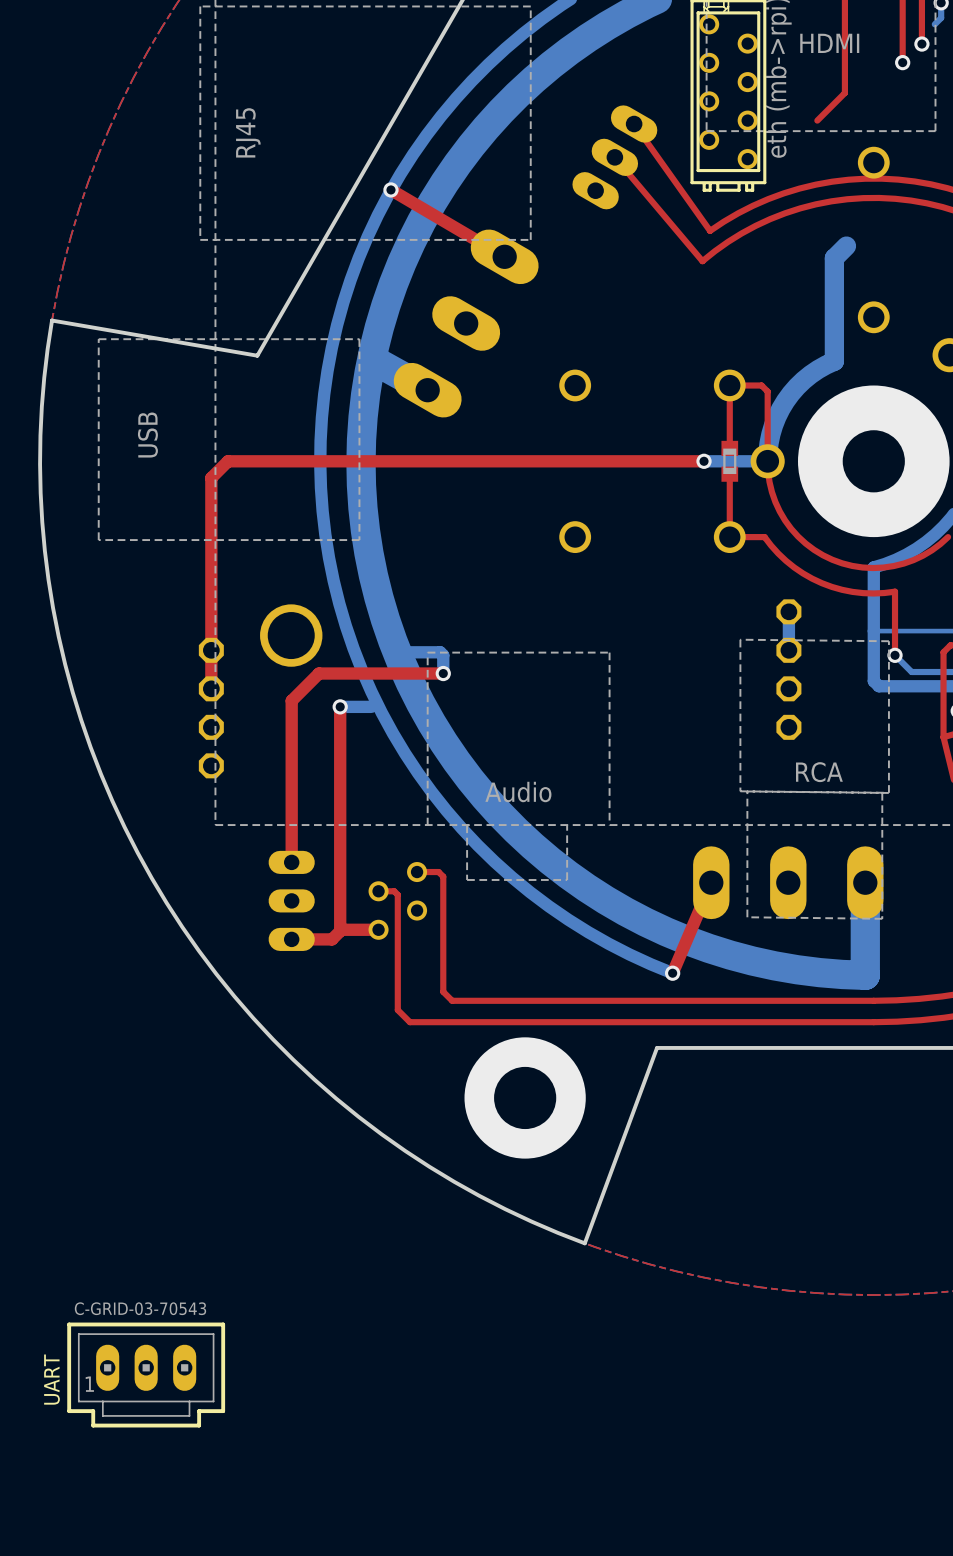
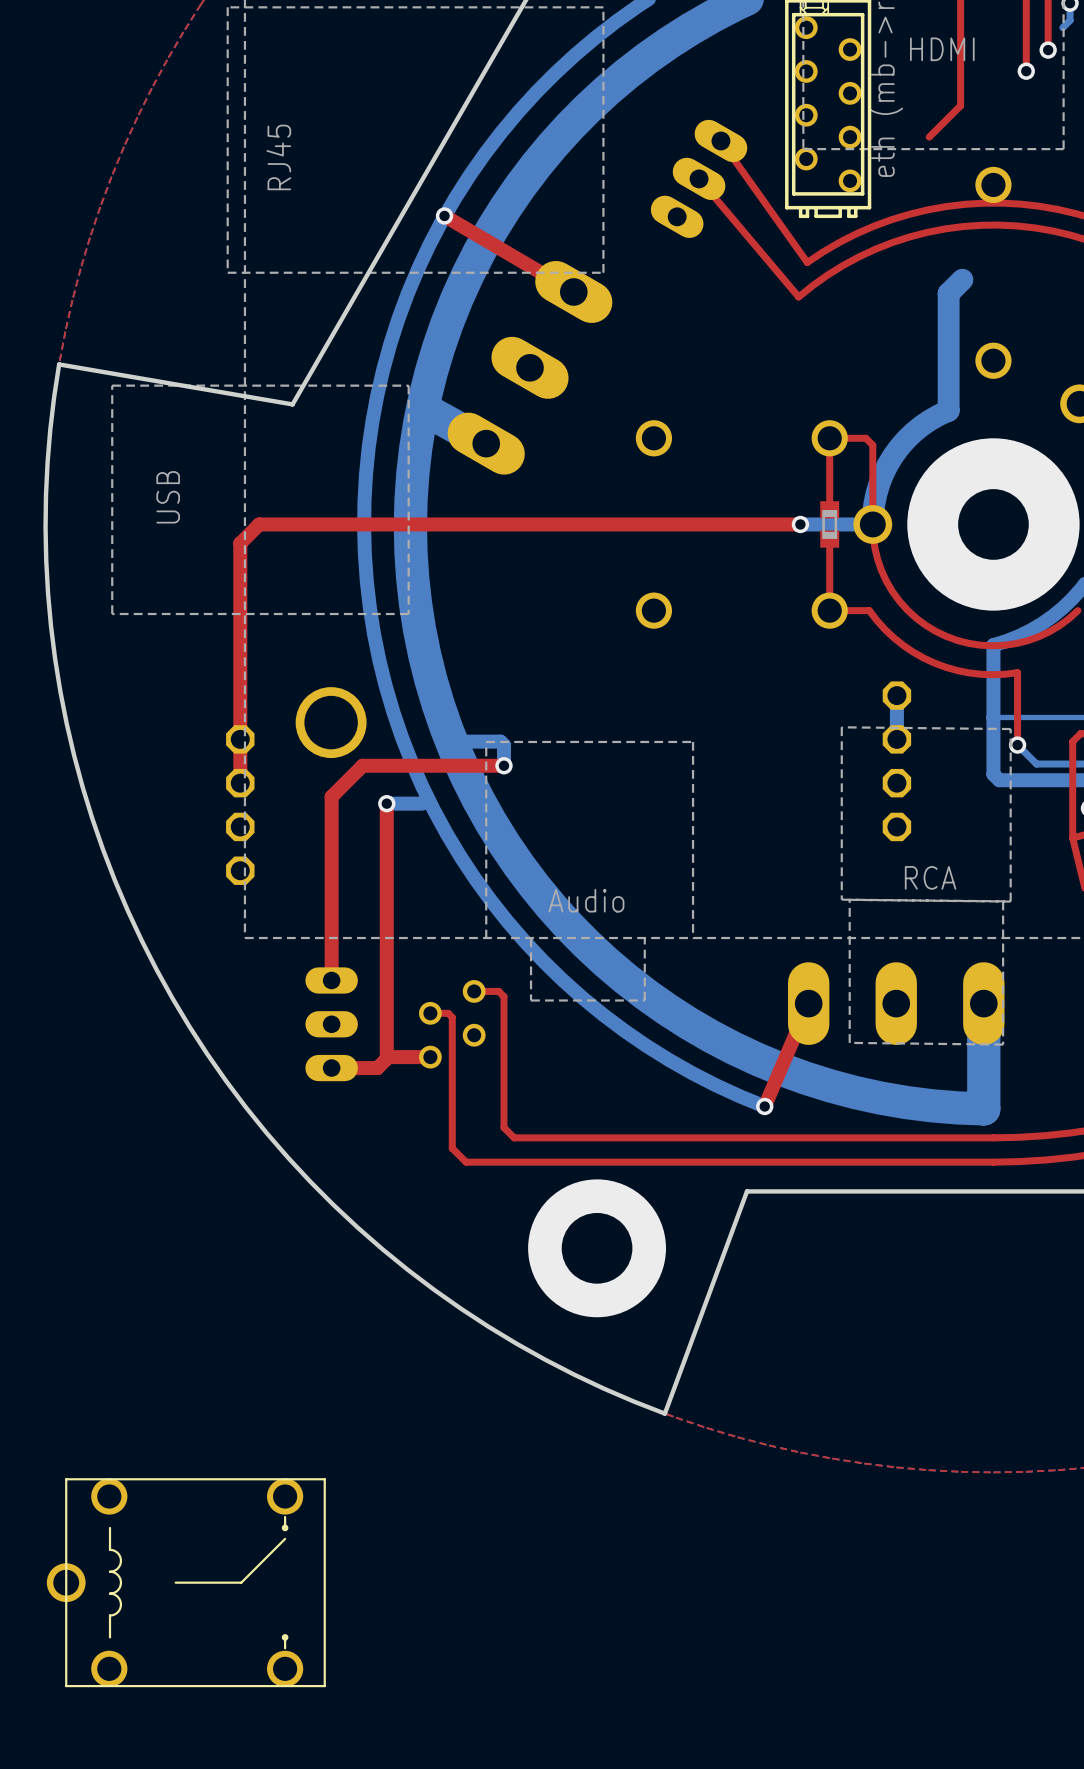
UART: C-GRID-03-70543 (146, 1375) -> none
part: none -> (186, 1582)

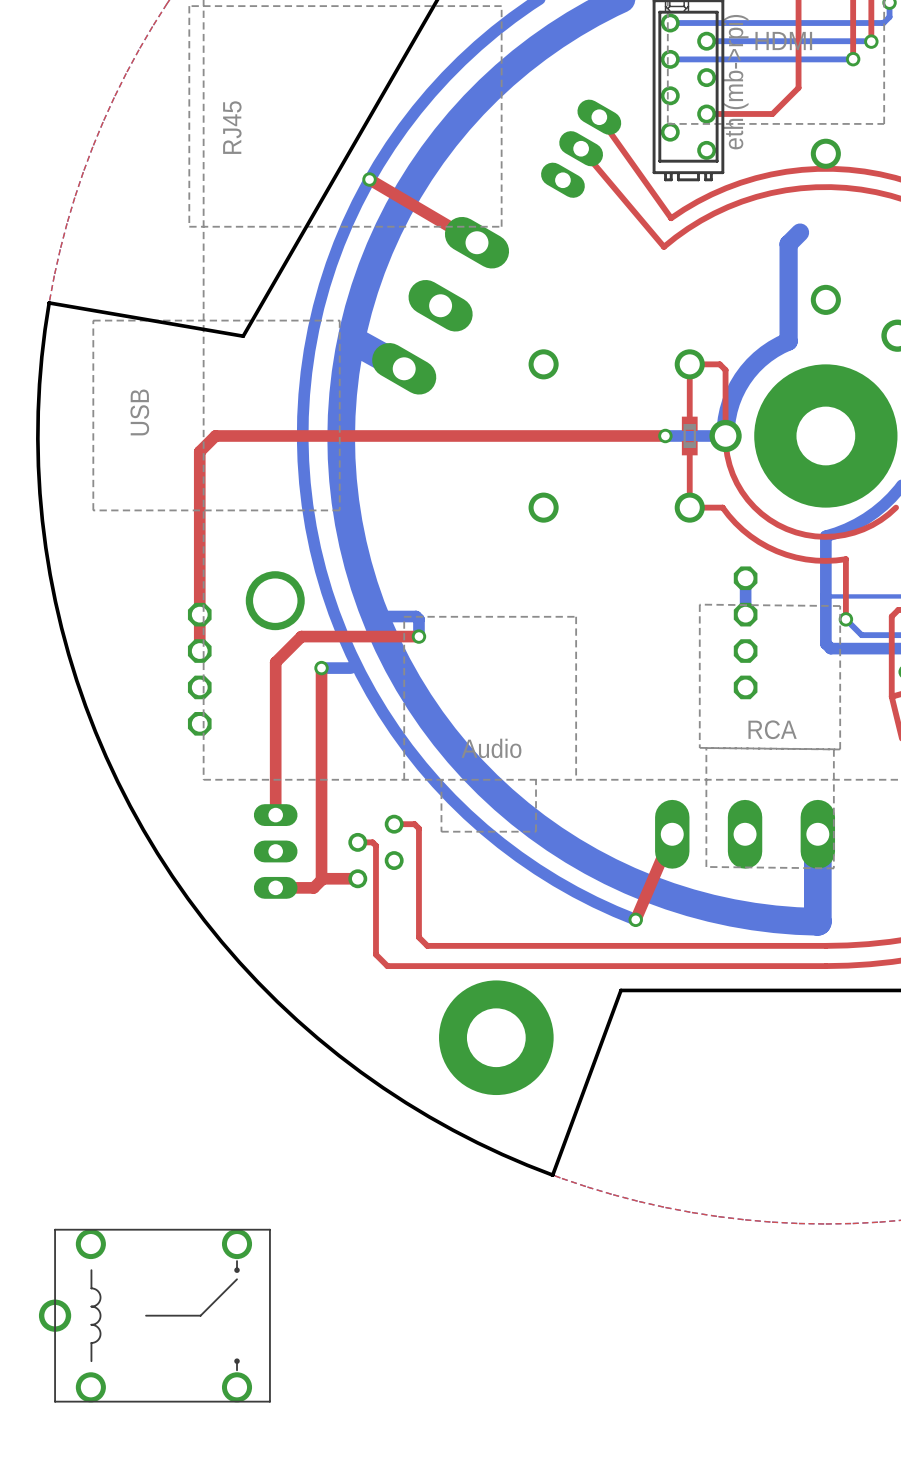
bottom track: none -> (670, 23) (883, 23)
bottom track: none -> (706, 41) (870, 41)
bottom track: none -> (670, 59) (853, 59)
top track: none -> (706, 113) (772, 113)

